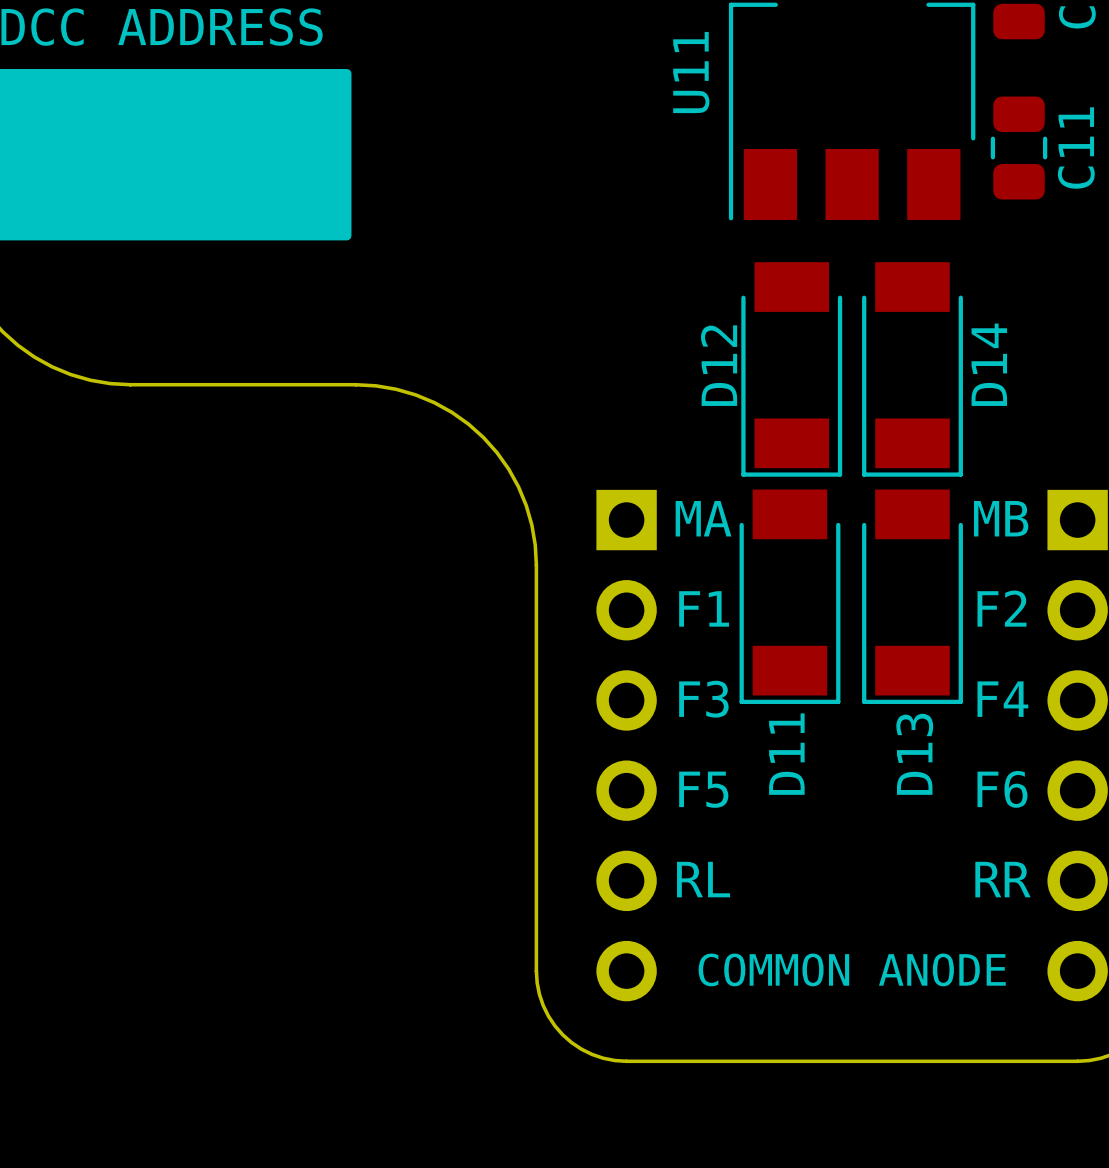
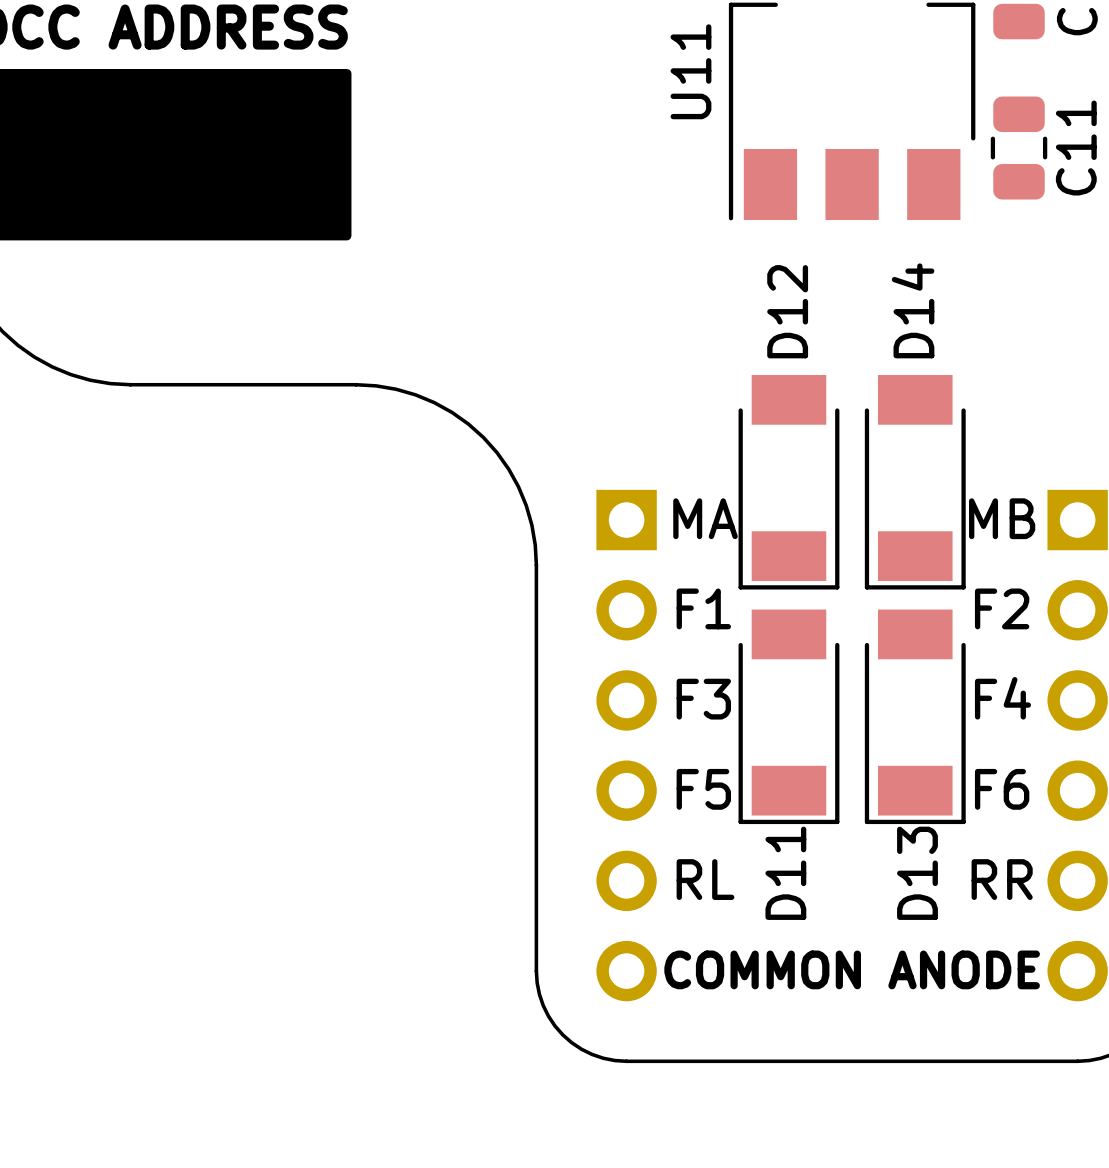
D14 name position: D14 (989, 364) -> D14 (913, 310)
D12 name position: D12 (719, 365) -> D12 (787, 311)
D12 position: (791, 369) -> (788, 482)
D14 position: (912, 369) -> (915, 482)
D11 position: (789, 596) -> (788, 716)
D13 position: (912, 596) -> (915, 716)

